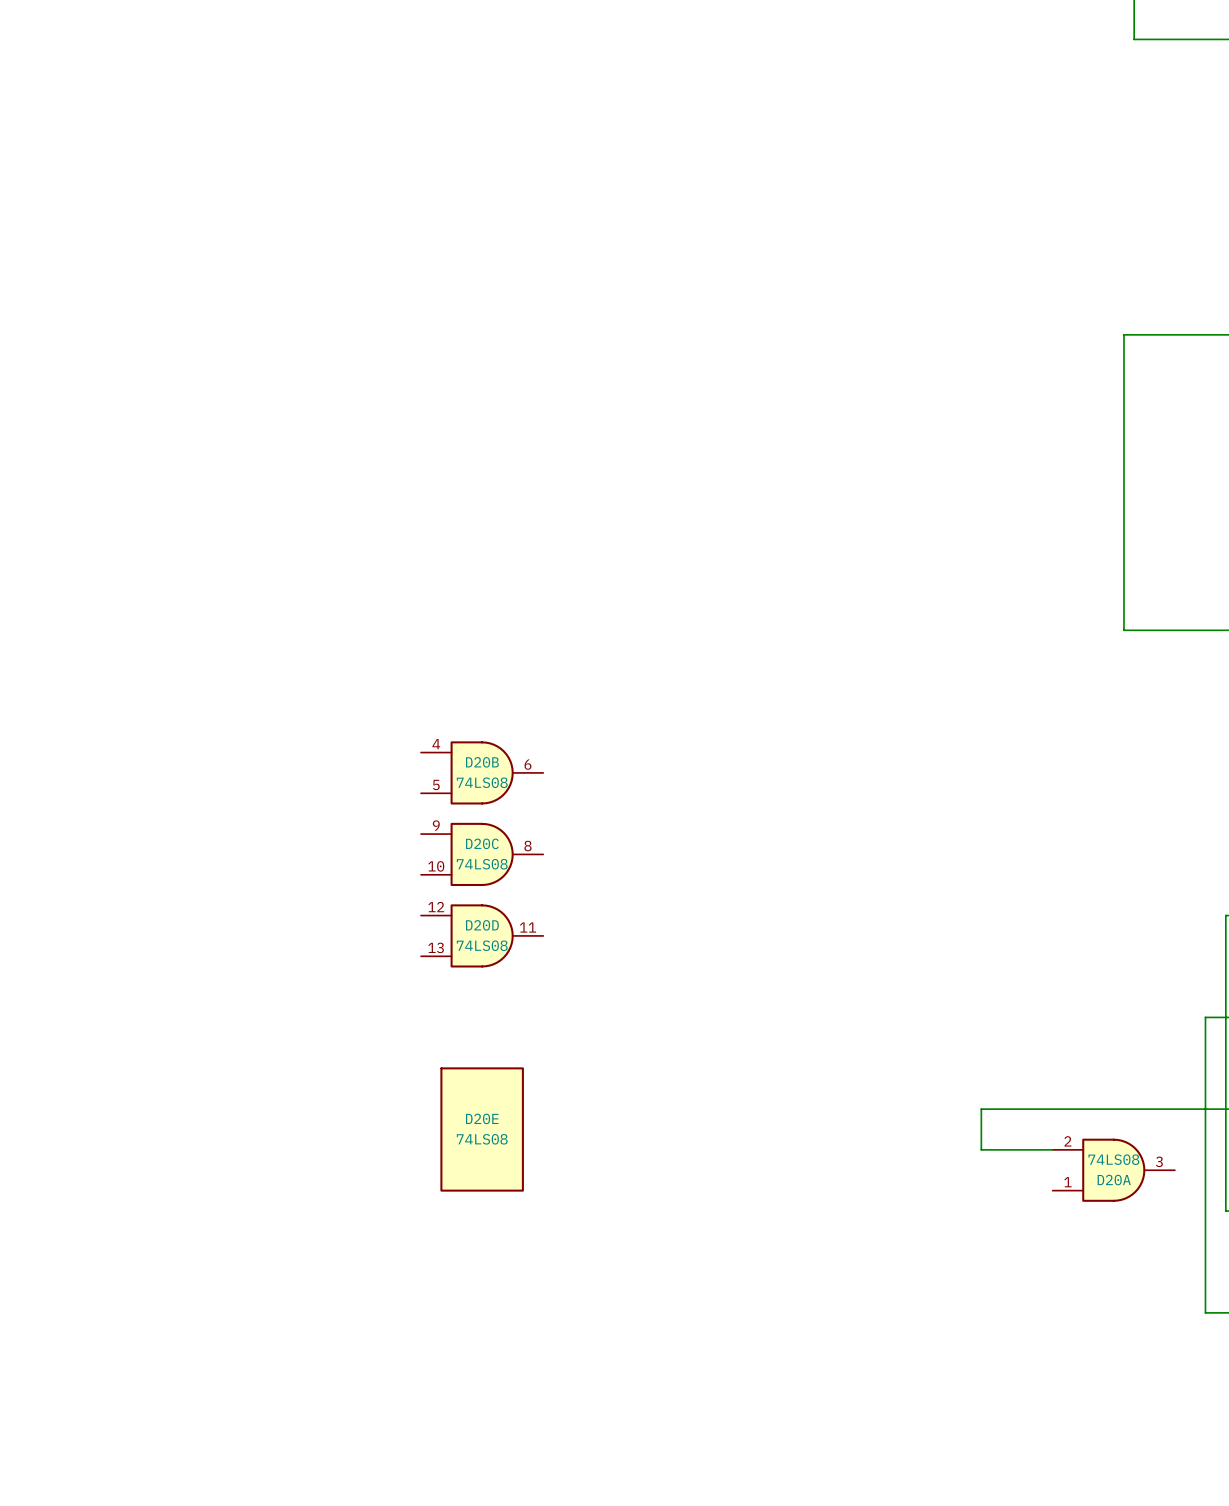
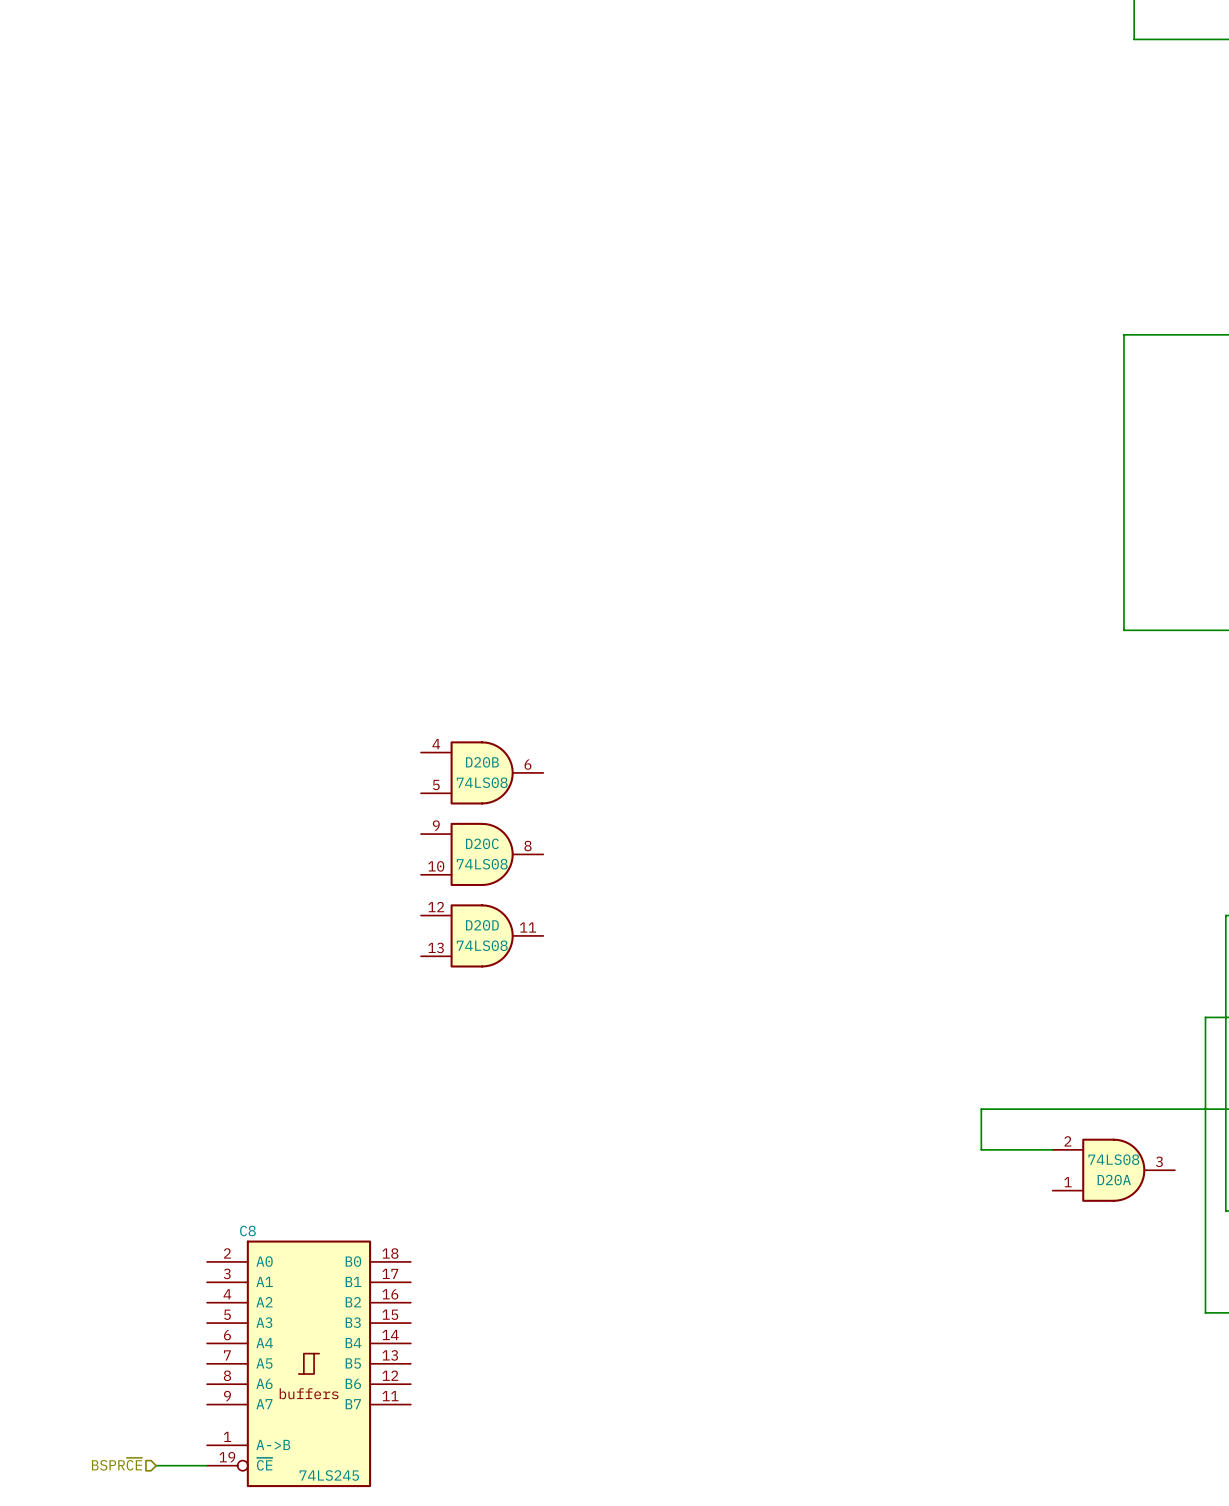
D20E: 74LS08 (482, 1129) -> none
C8: none -> 74LS245 (308, 1363)
hierarchical label: none -> BSPR~{CE} (117, 1464)
wire: none -> (156, 1465) (207, 1465)

